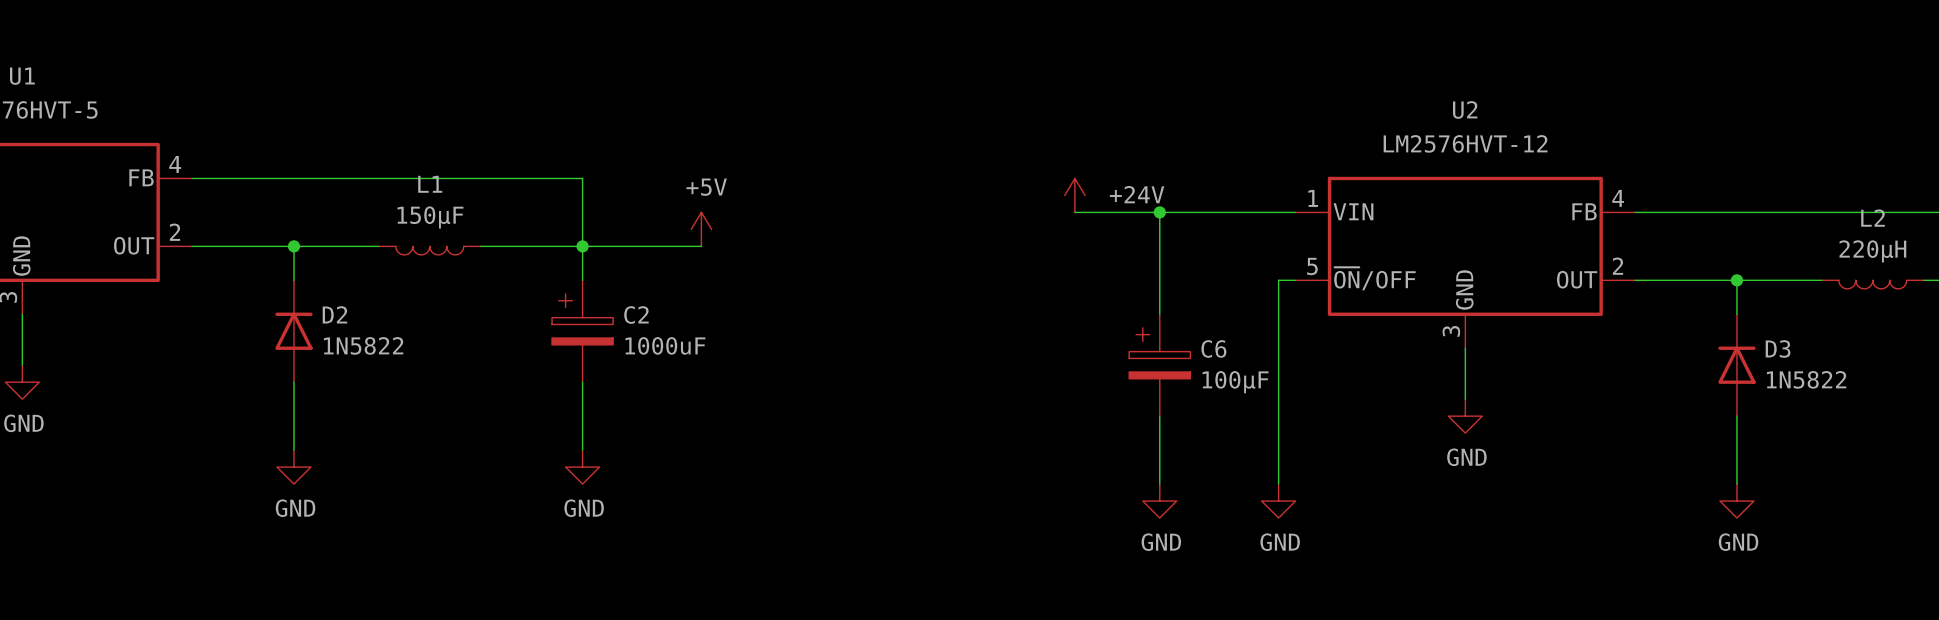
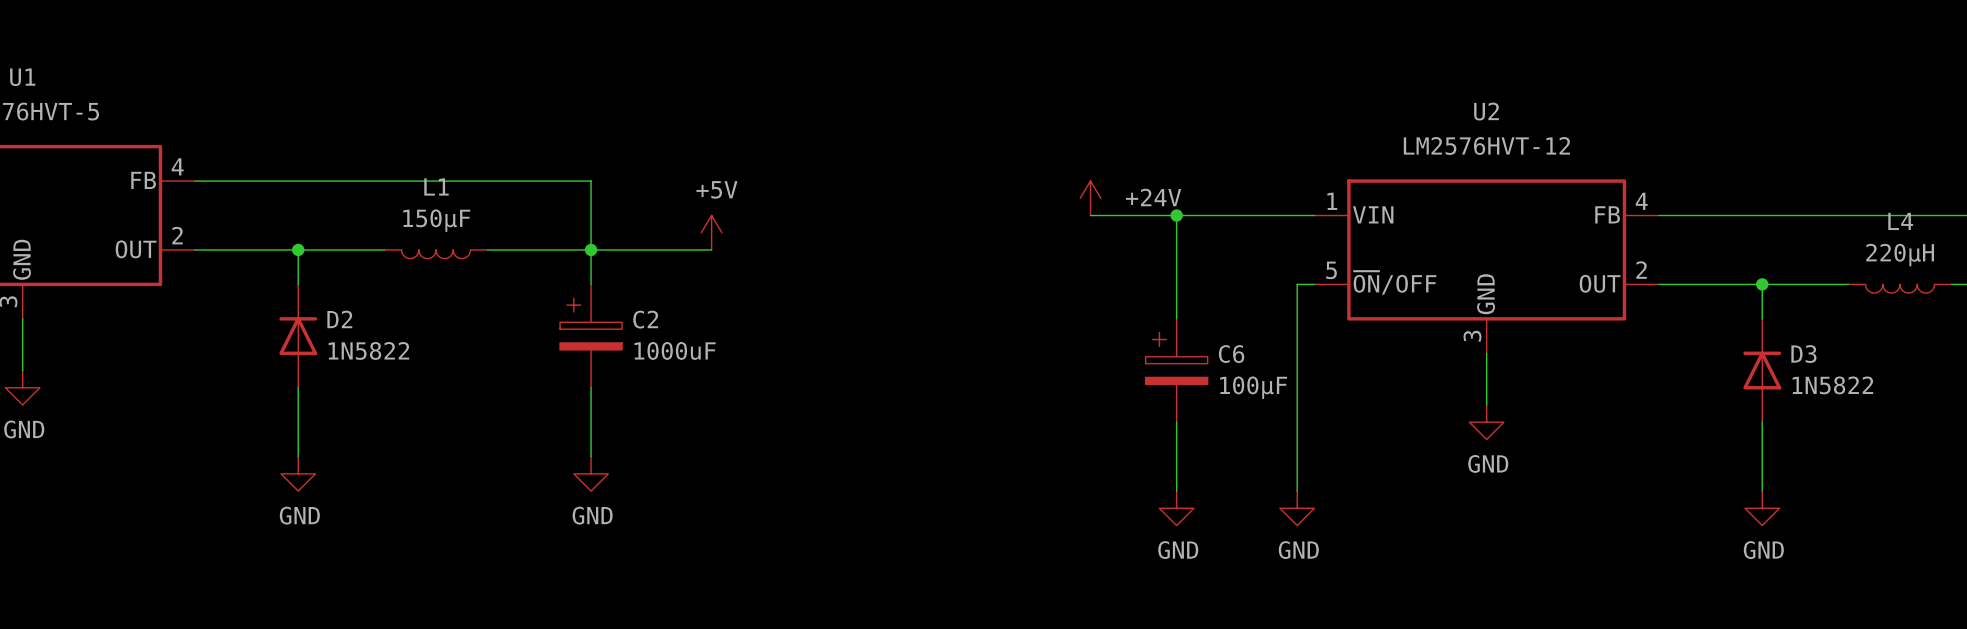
L2 name: L2 (1873, 218) -> L4 (1900, 221)

